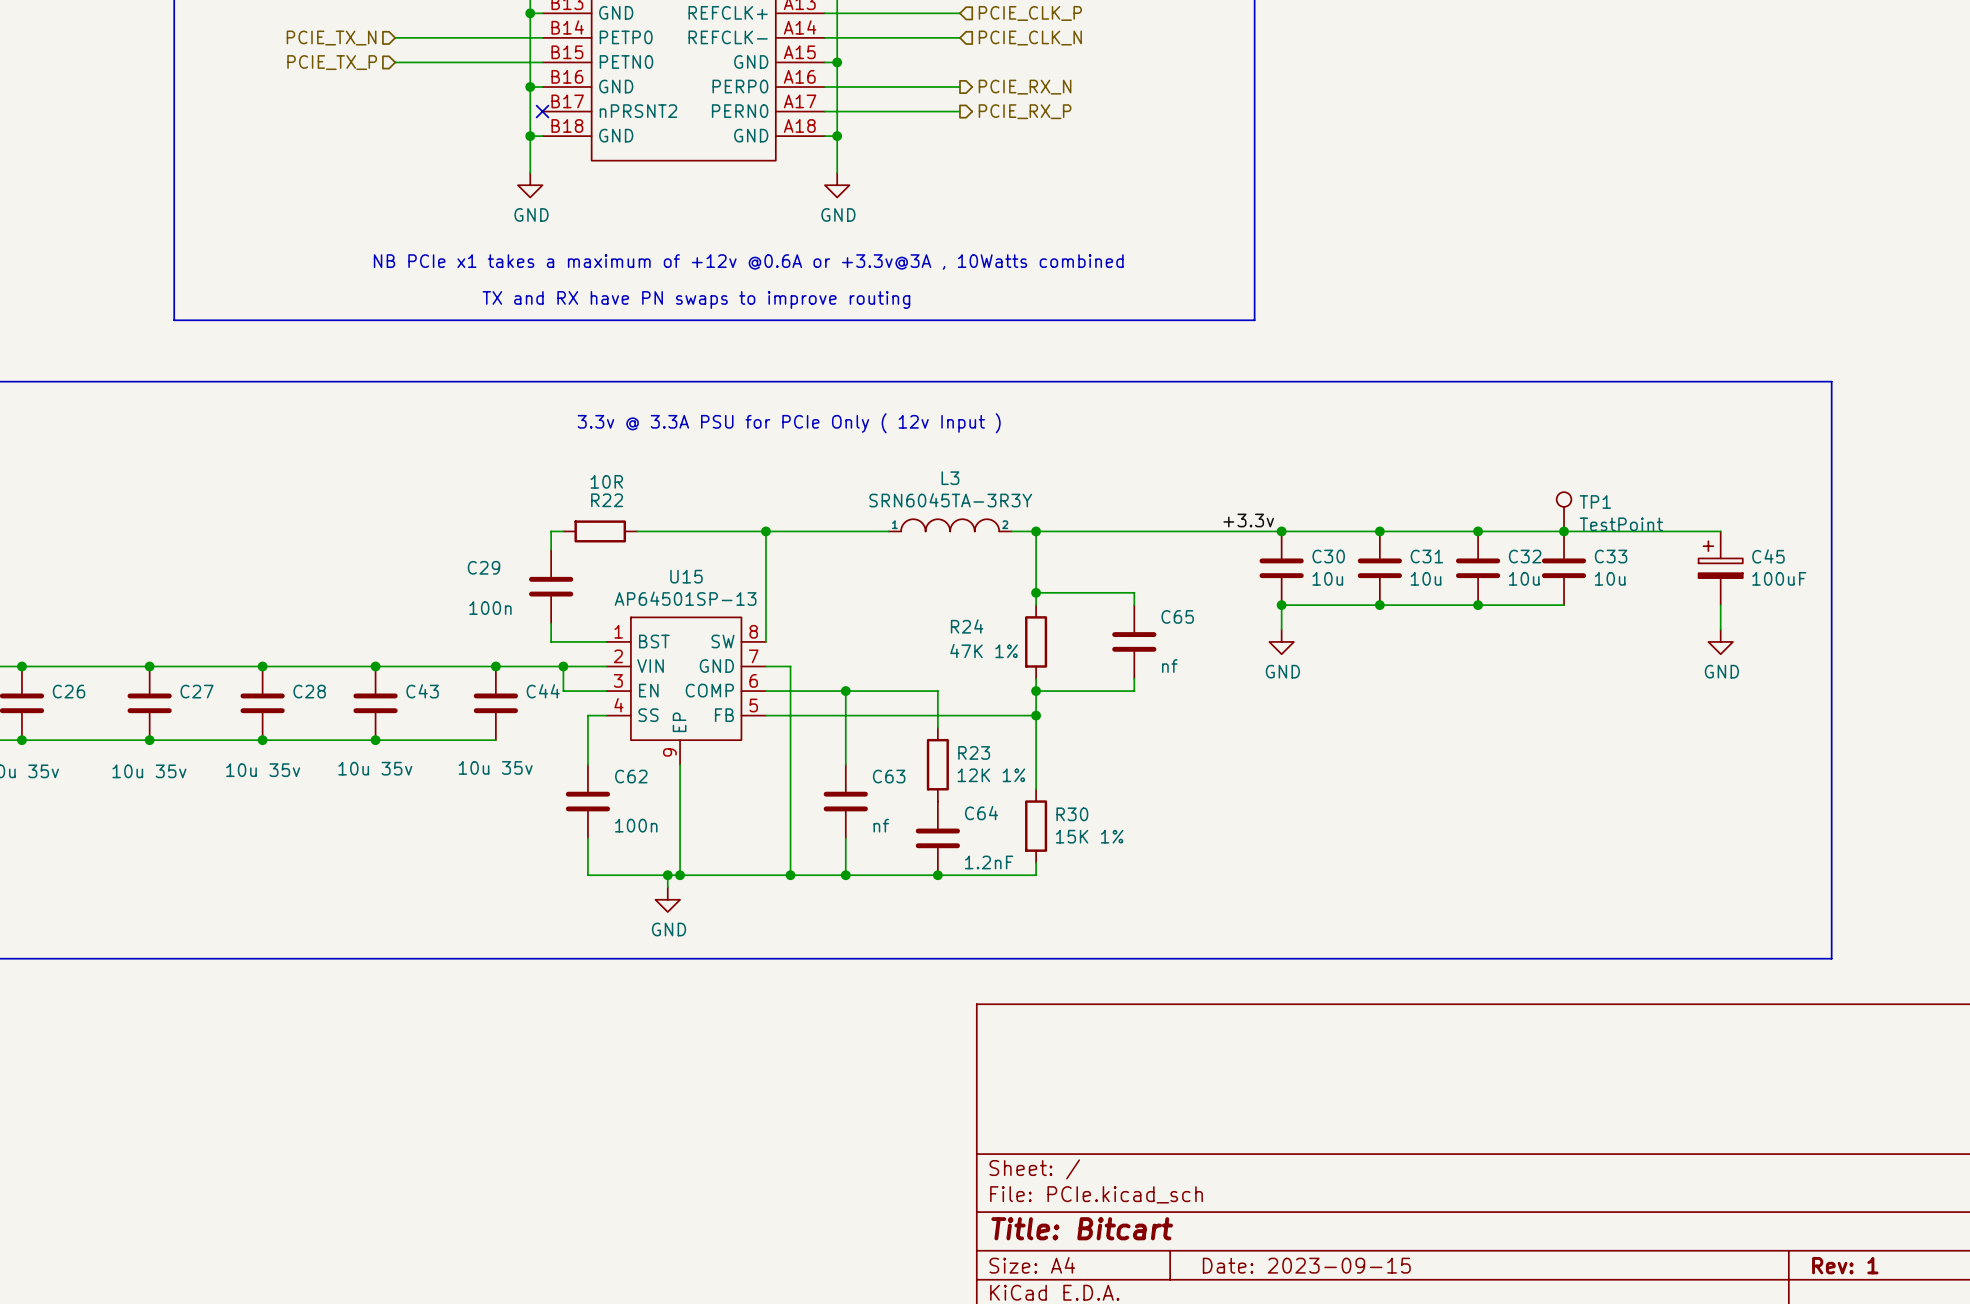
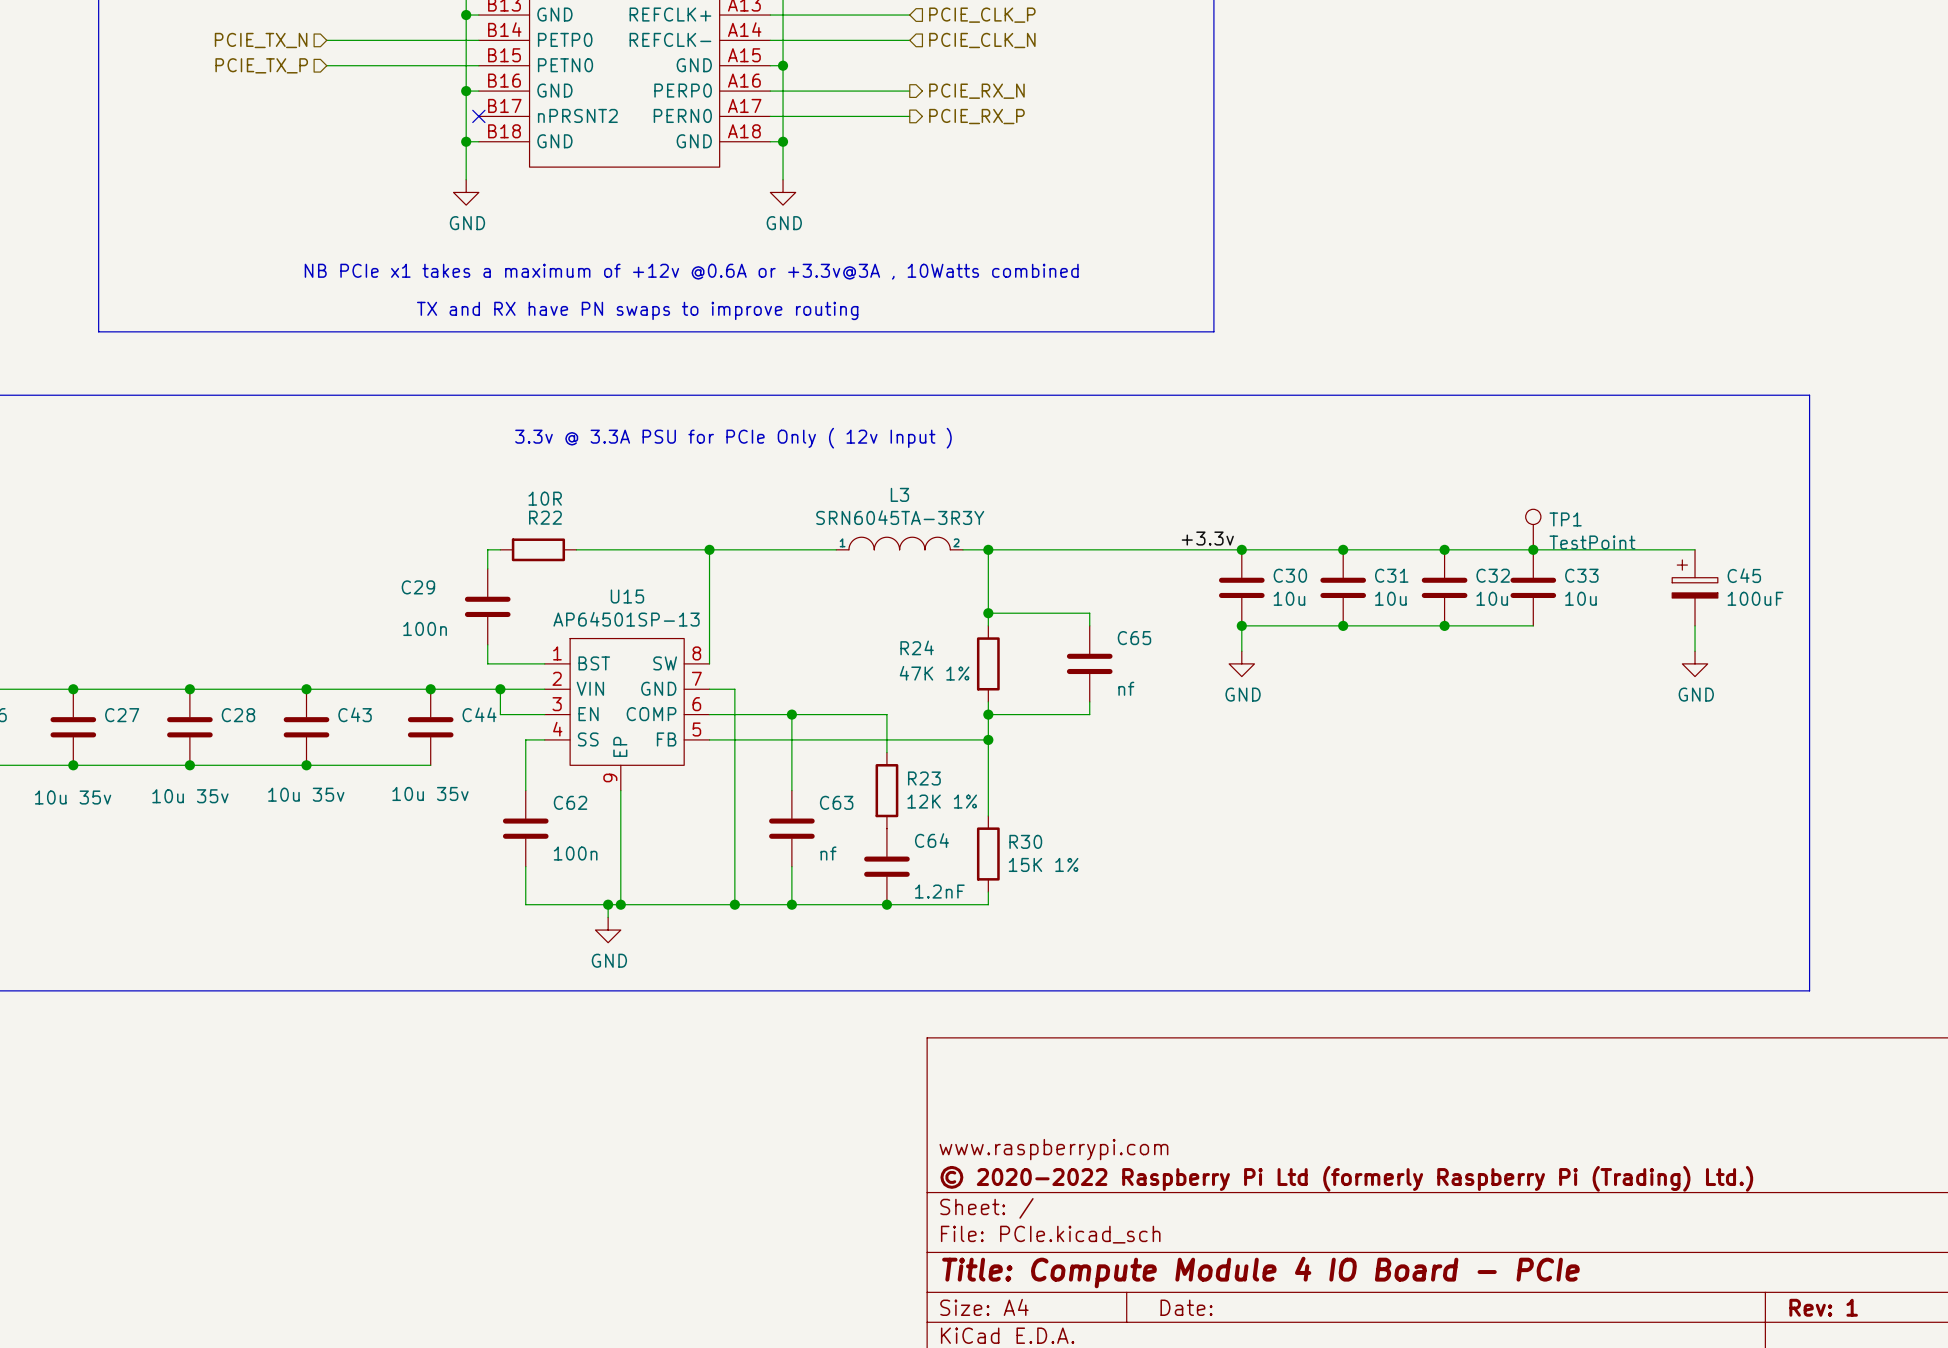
title block: none -> www.raspberrypi.com (1053, 1149)
title block: none -> © 2020-2022 Raspberry Pi Ltd (formerly Raspberry Pi (Trading) Ltd.) (1346, 1178)
title block: Title: Bitcart (1082, 1228) -> Title: Compute Module 4 IO Board - PCIe (1260, 1272)
title block: Date: 2023-09-15 (1306, 1265) -> Date: (1186, 1307)

